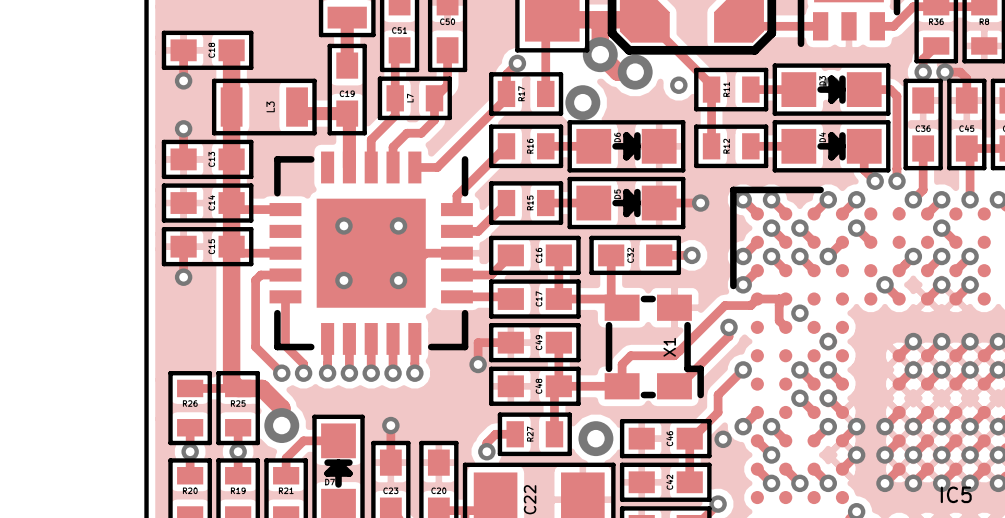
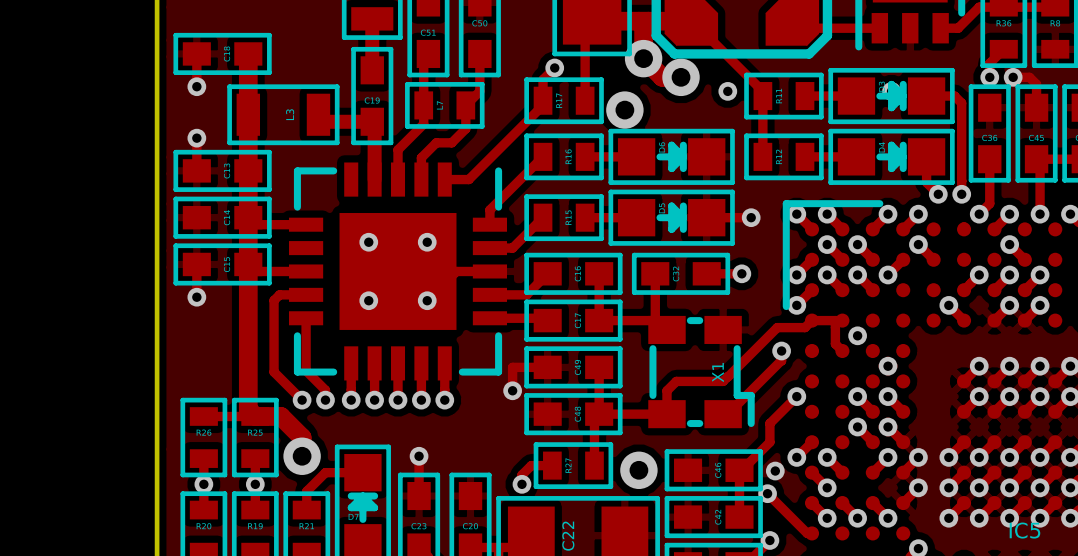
track: none -> (767, 493) (807, 533) (812, 533)
via: none -> (767, 493)

